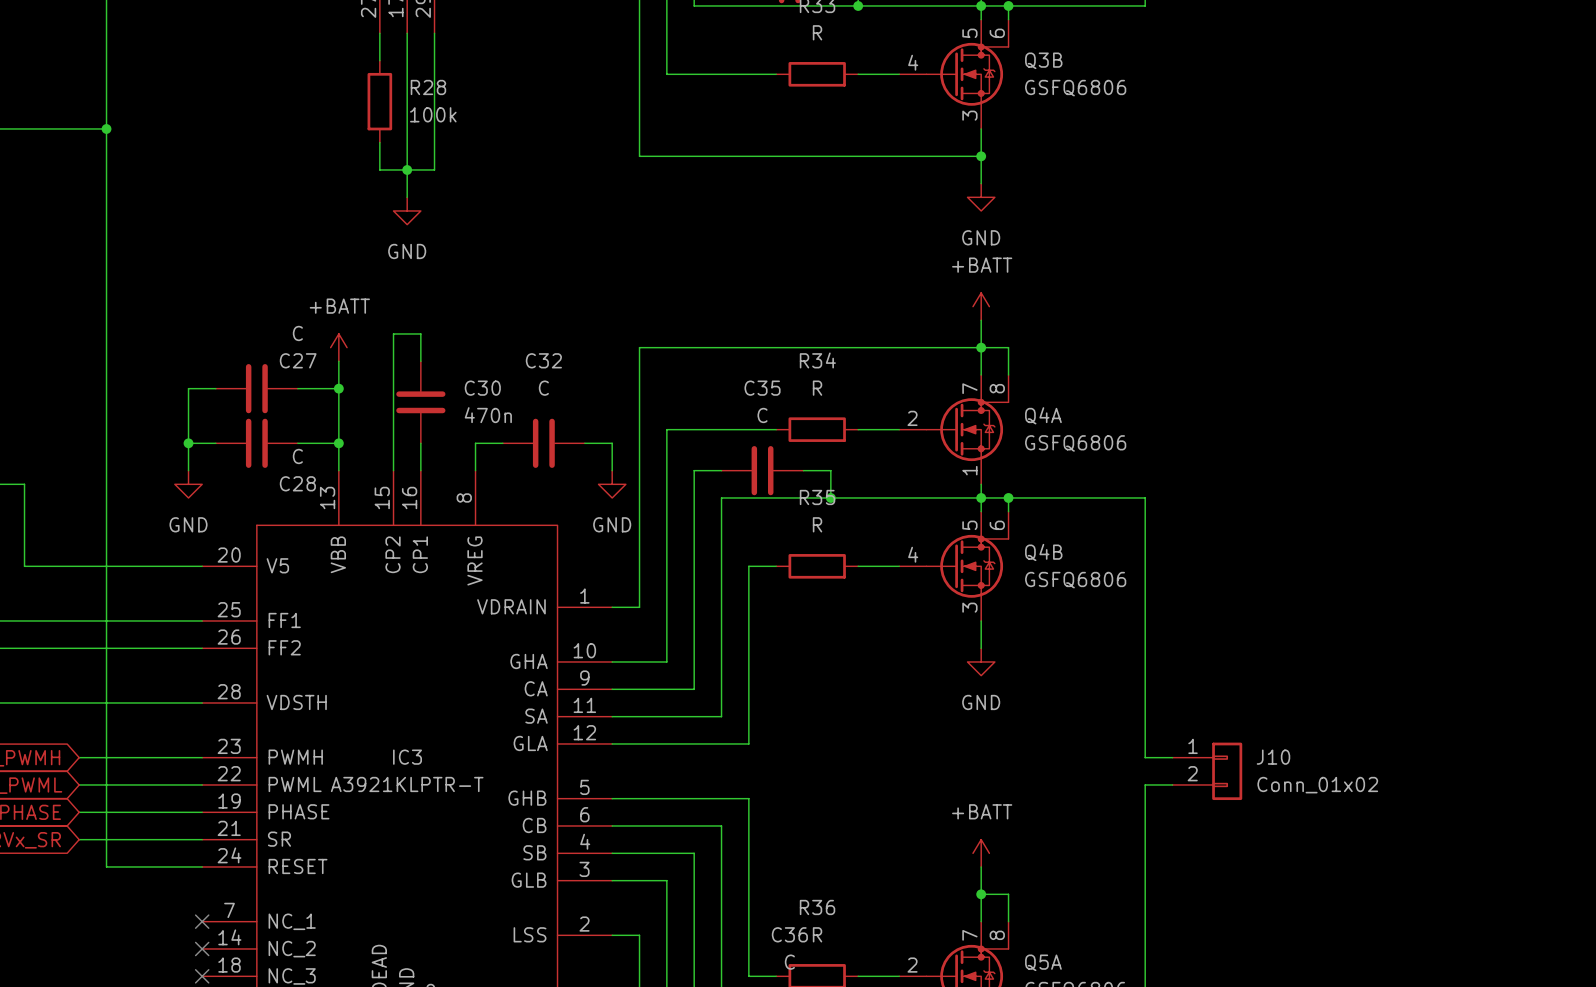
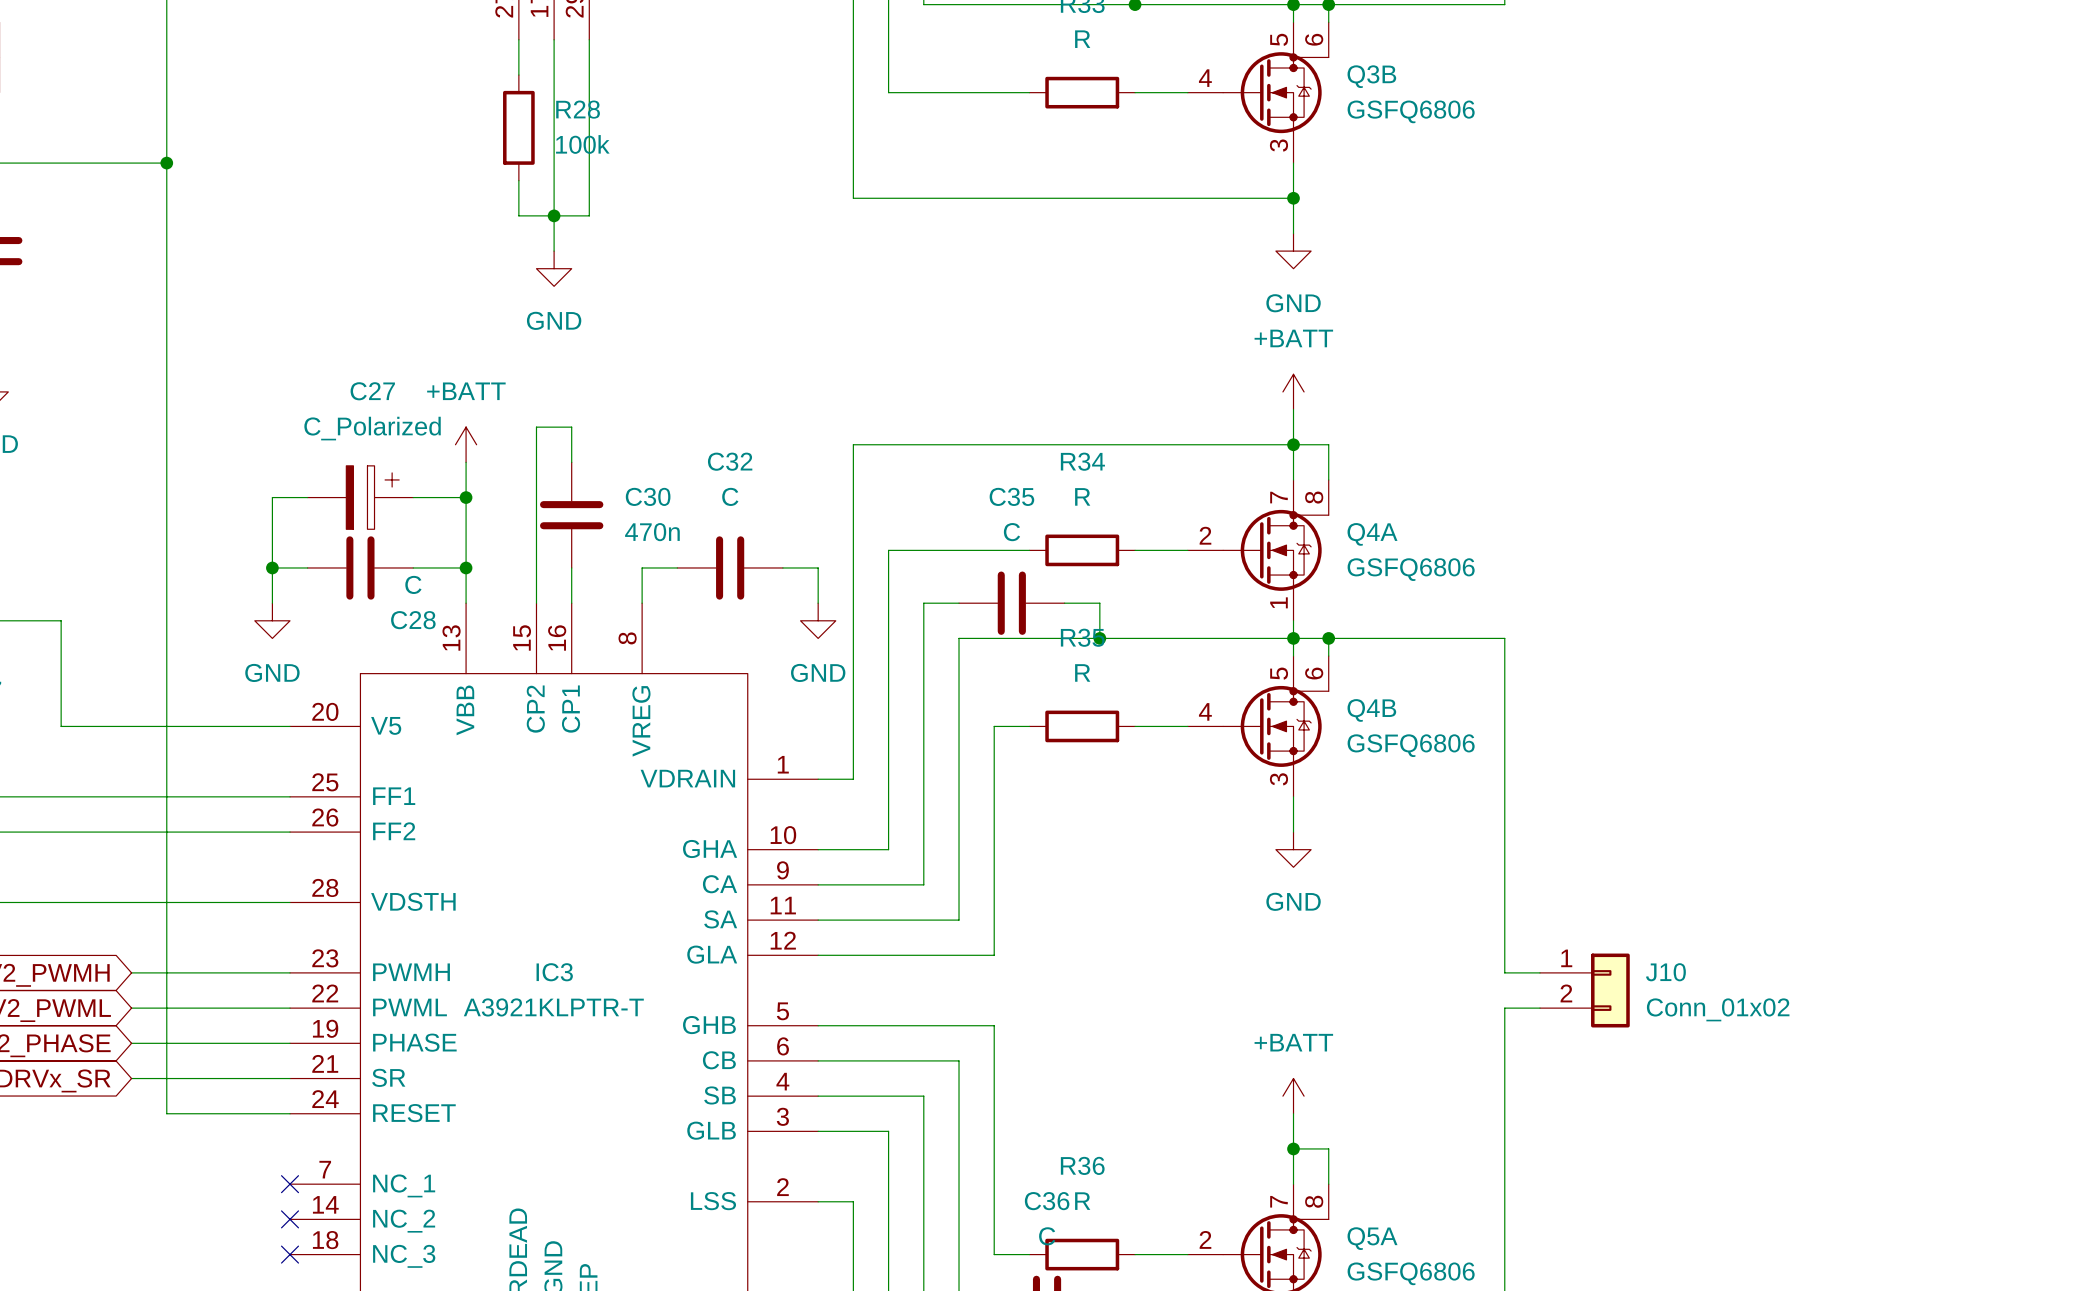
C27 value: C (297, 333) -> C_Polarized (372, 428)
C27 name position: C27 (298, 360) -> C27 (372, 391)
C27 symbol: [215, 364, 298, 414] -> [307, 465, 414, 530]

